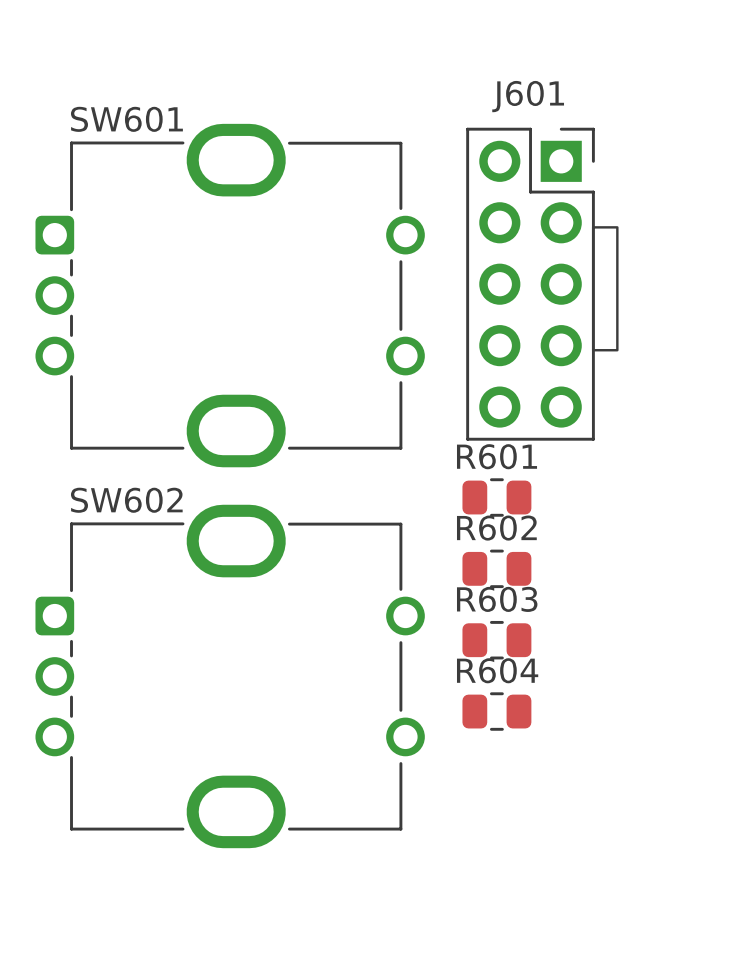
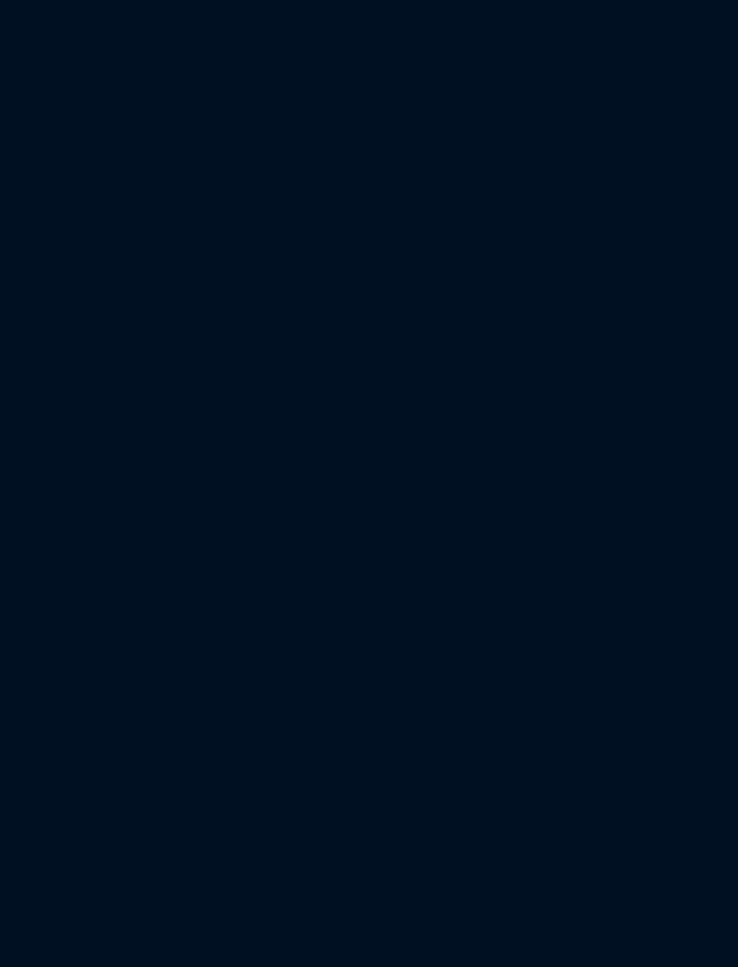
J601: (542, 284) -> none
SW601: (230, 295) -> none
R601: (496, 497) -> none
R602: (496, 568) -> none
R603: (496, 640) -> none
SW602: (230, 676) -> none
R604: (496, 711) -> none

